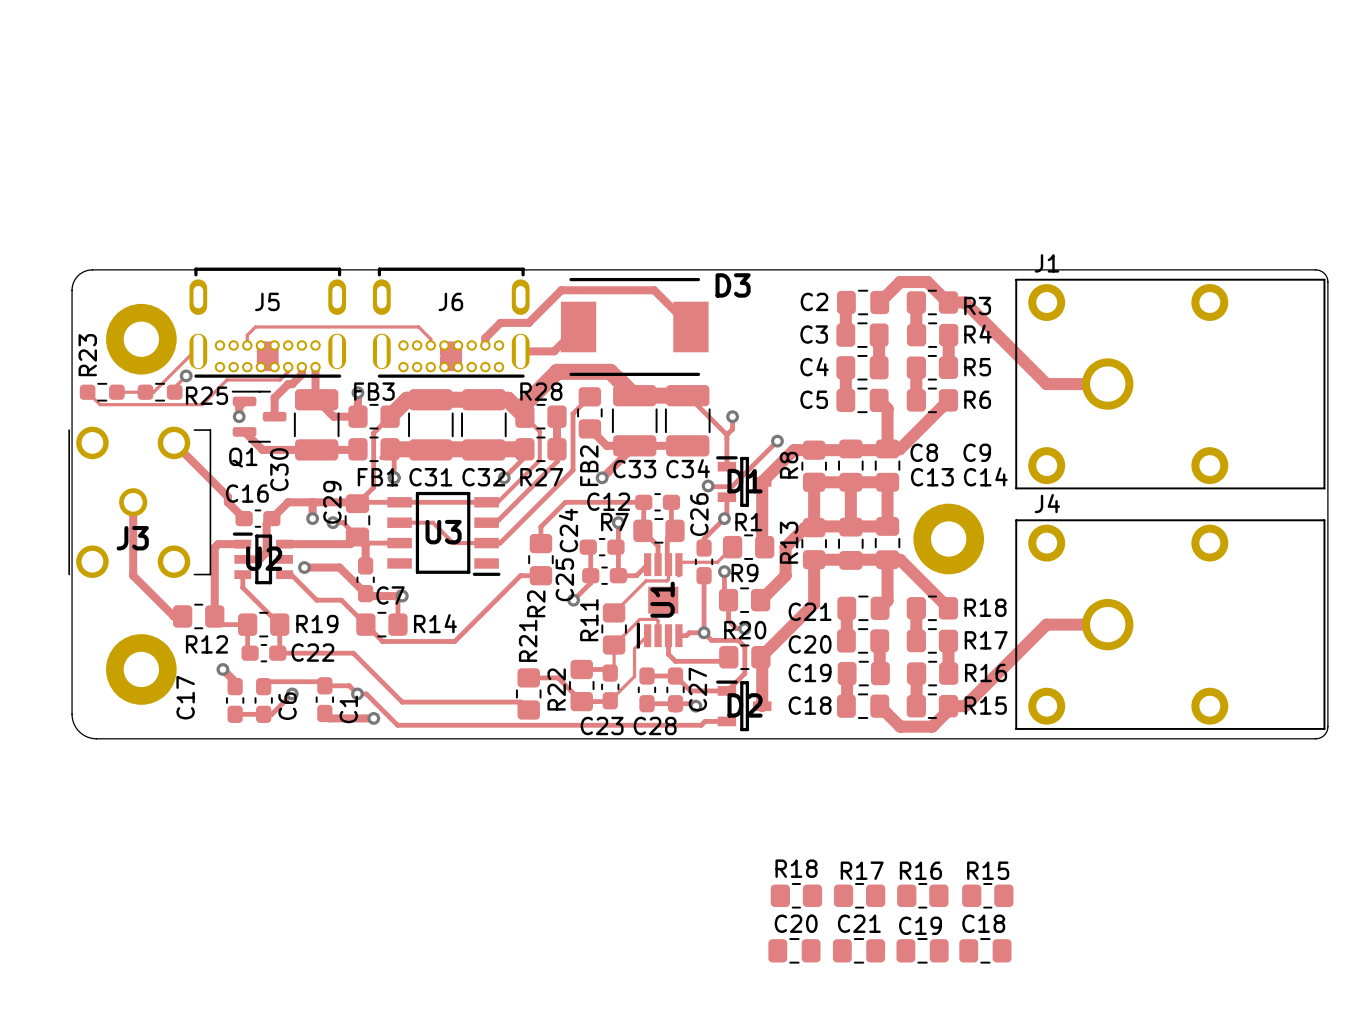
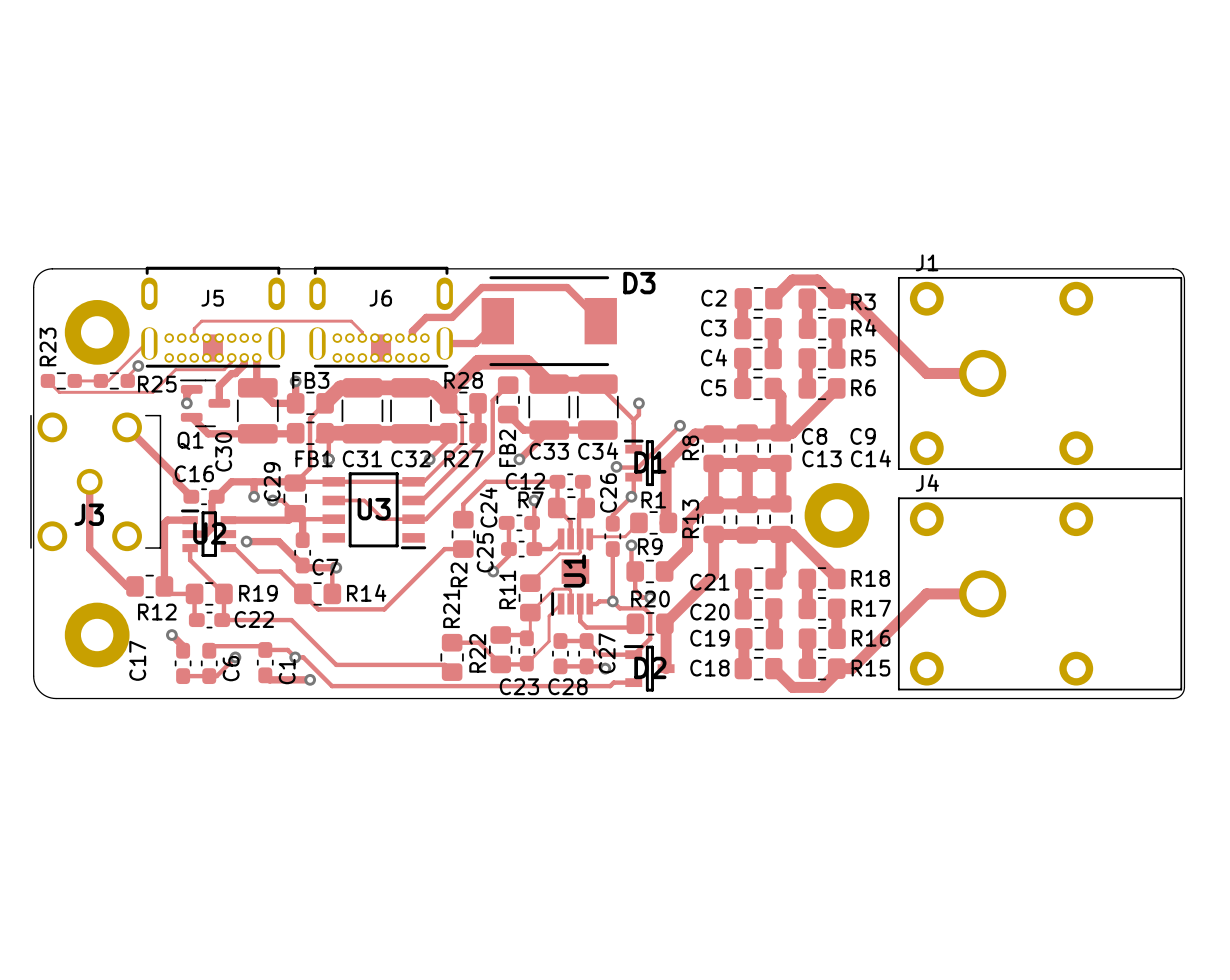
R18: (796, 895) -> none
R17: (859, 895) -> none
R16: (922, 895) -> none
R15: (987, 895) -> none
C21: (794, 950) -> none
C20: (858, 950) -> none
C19: (922, 950) -> none
C18: (985, 950) -> none

